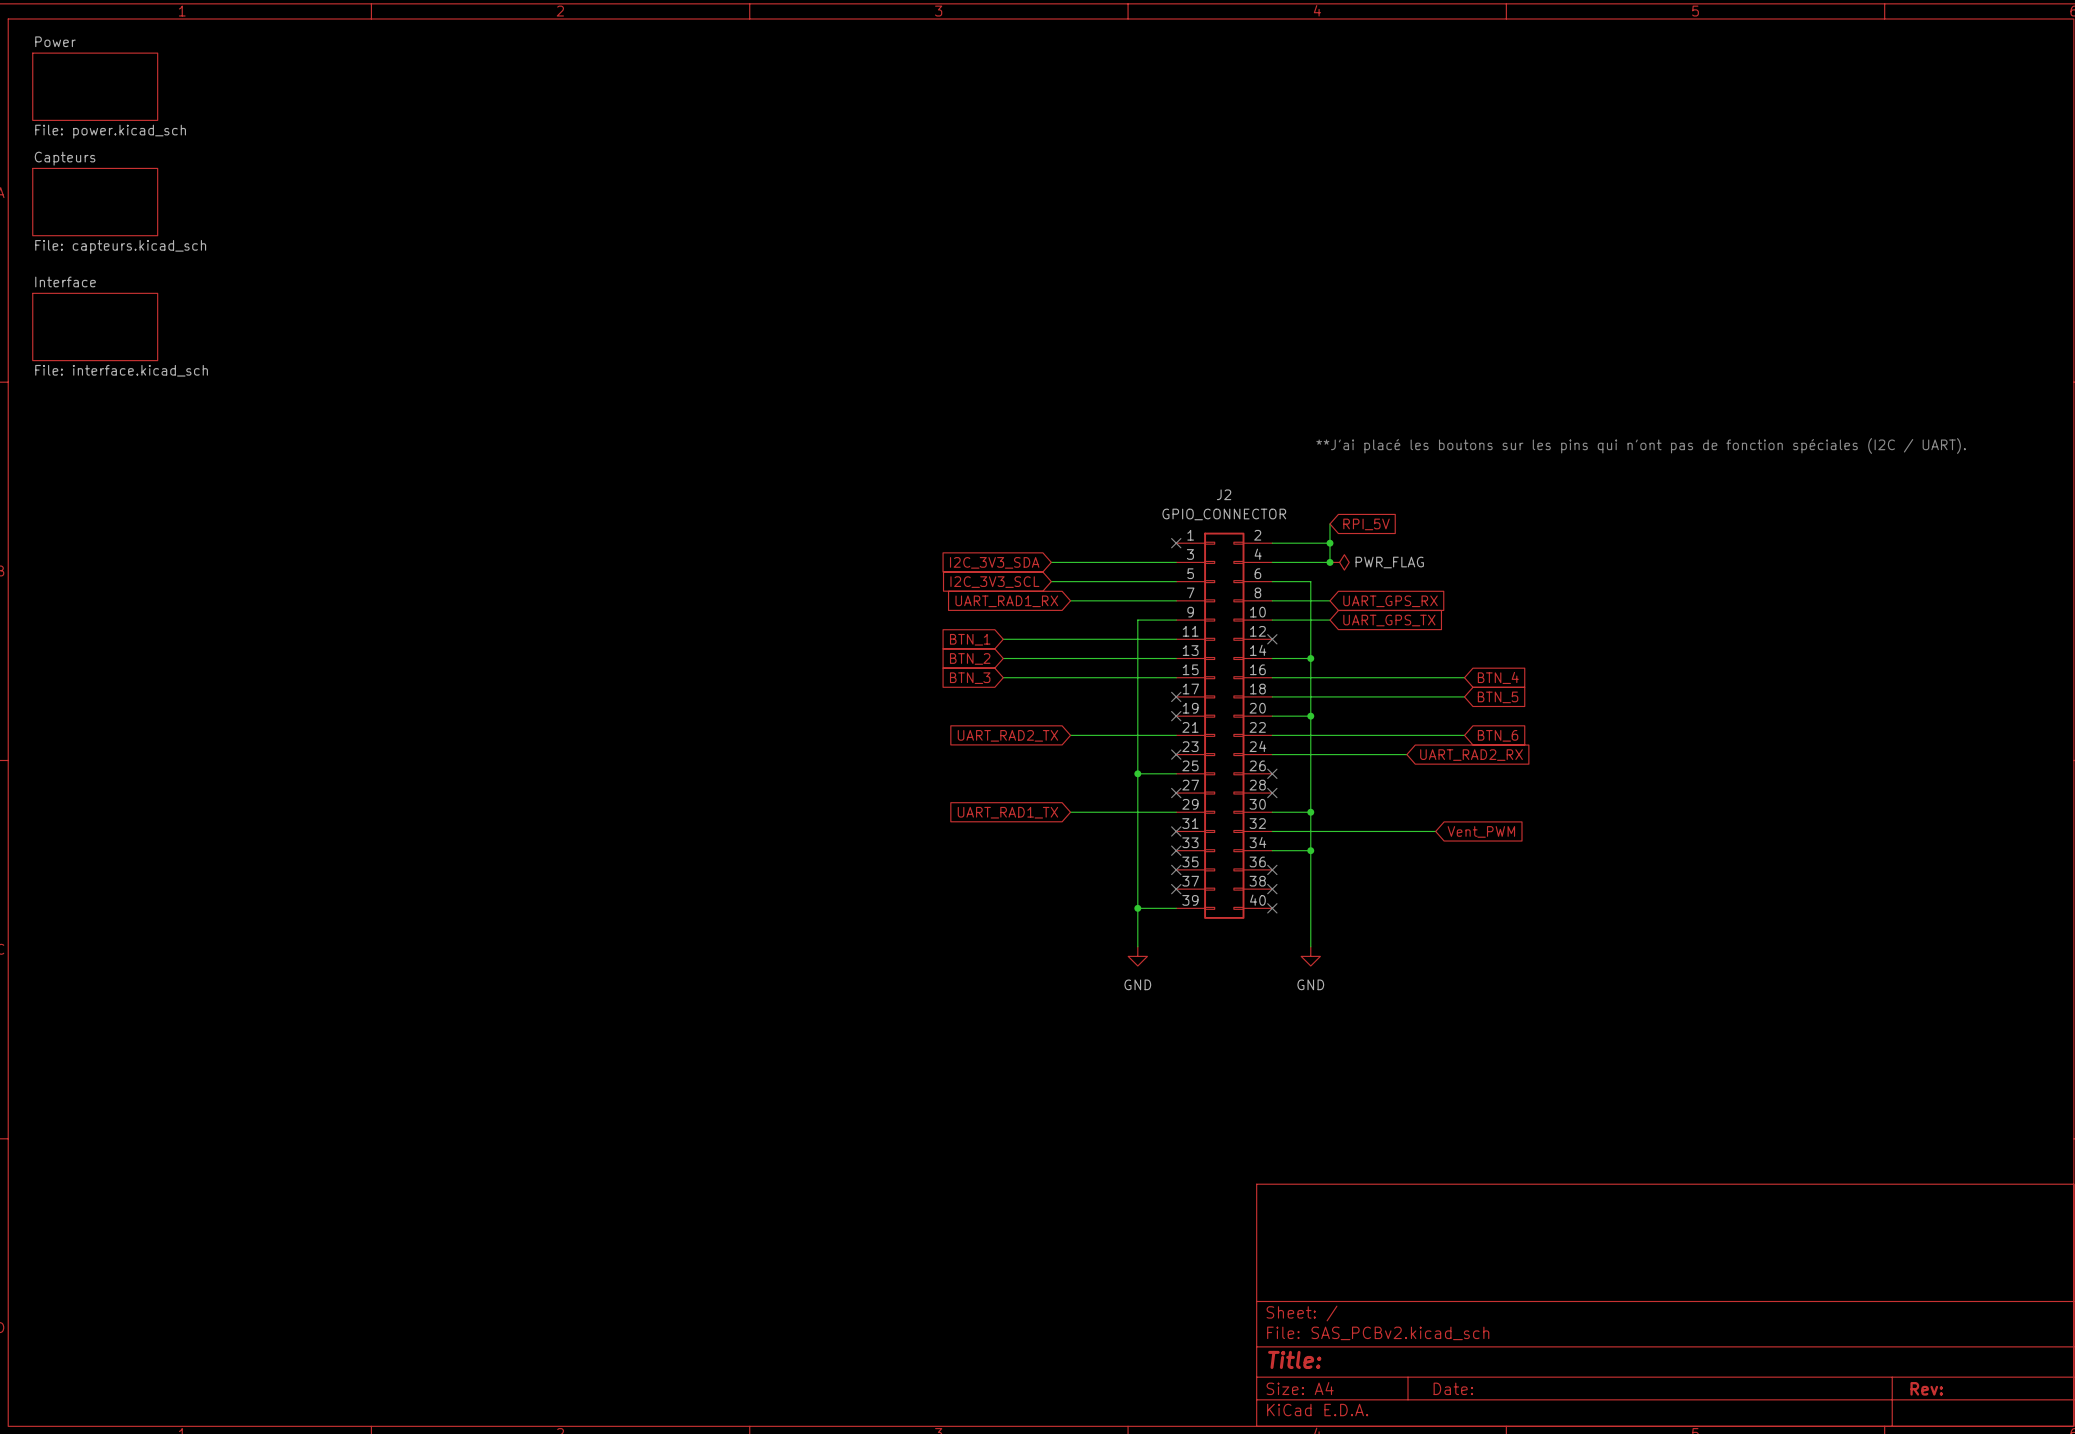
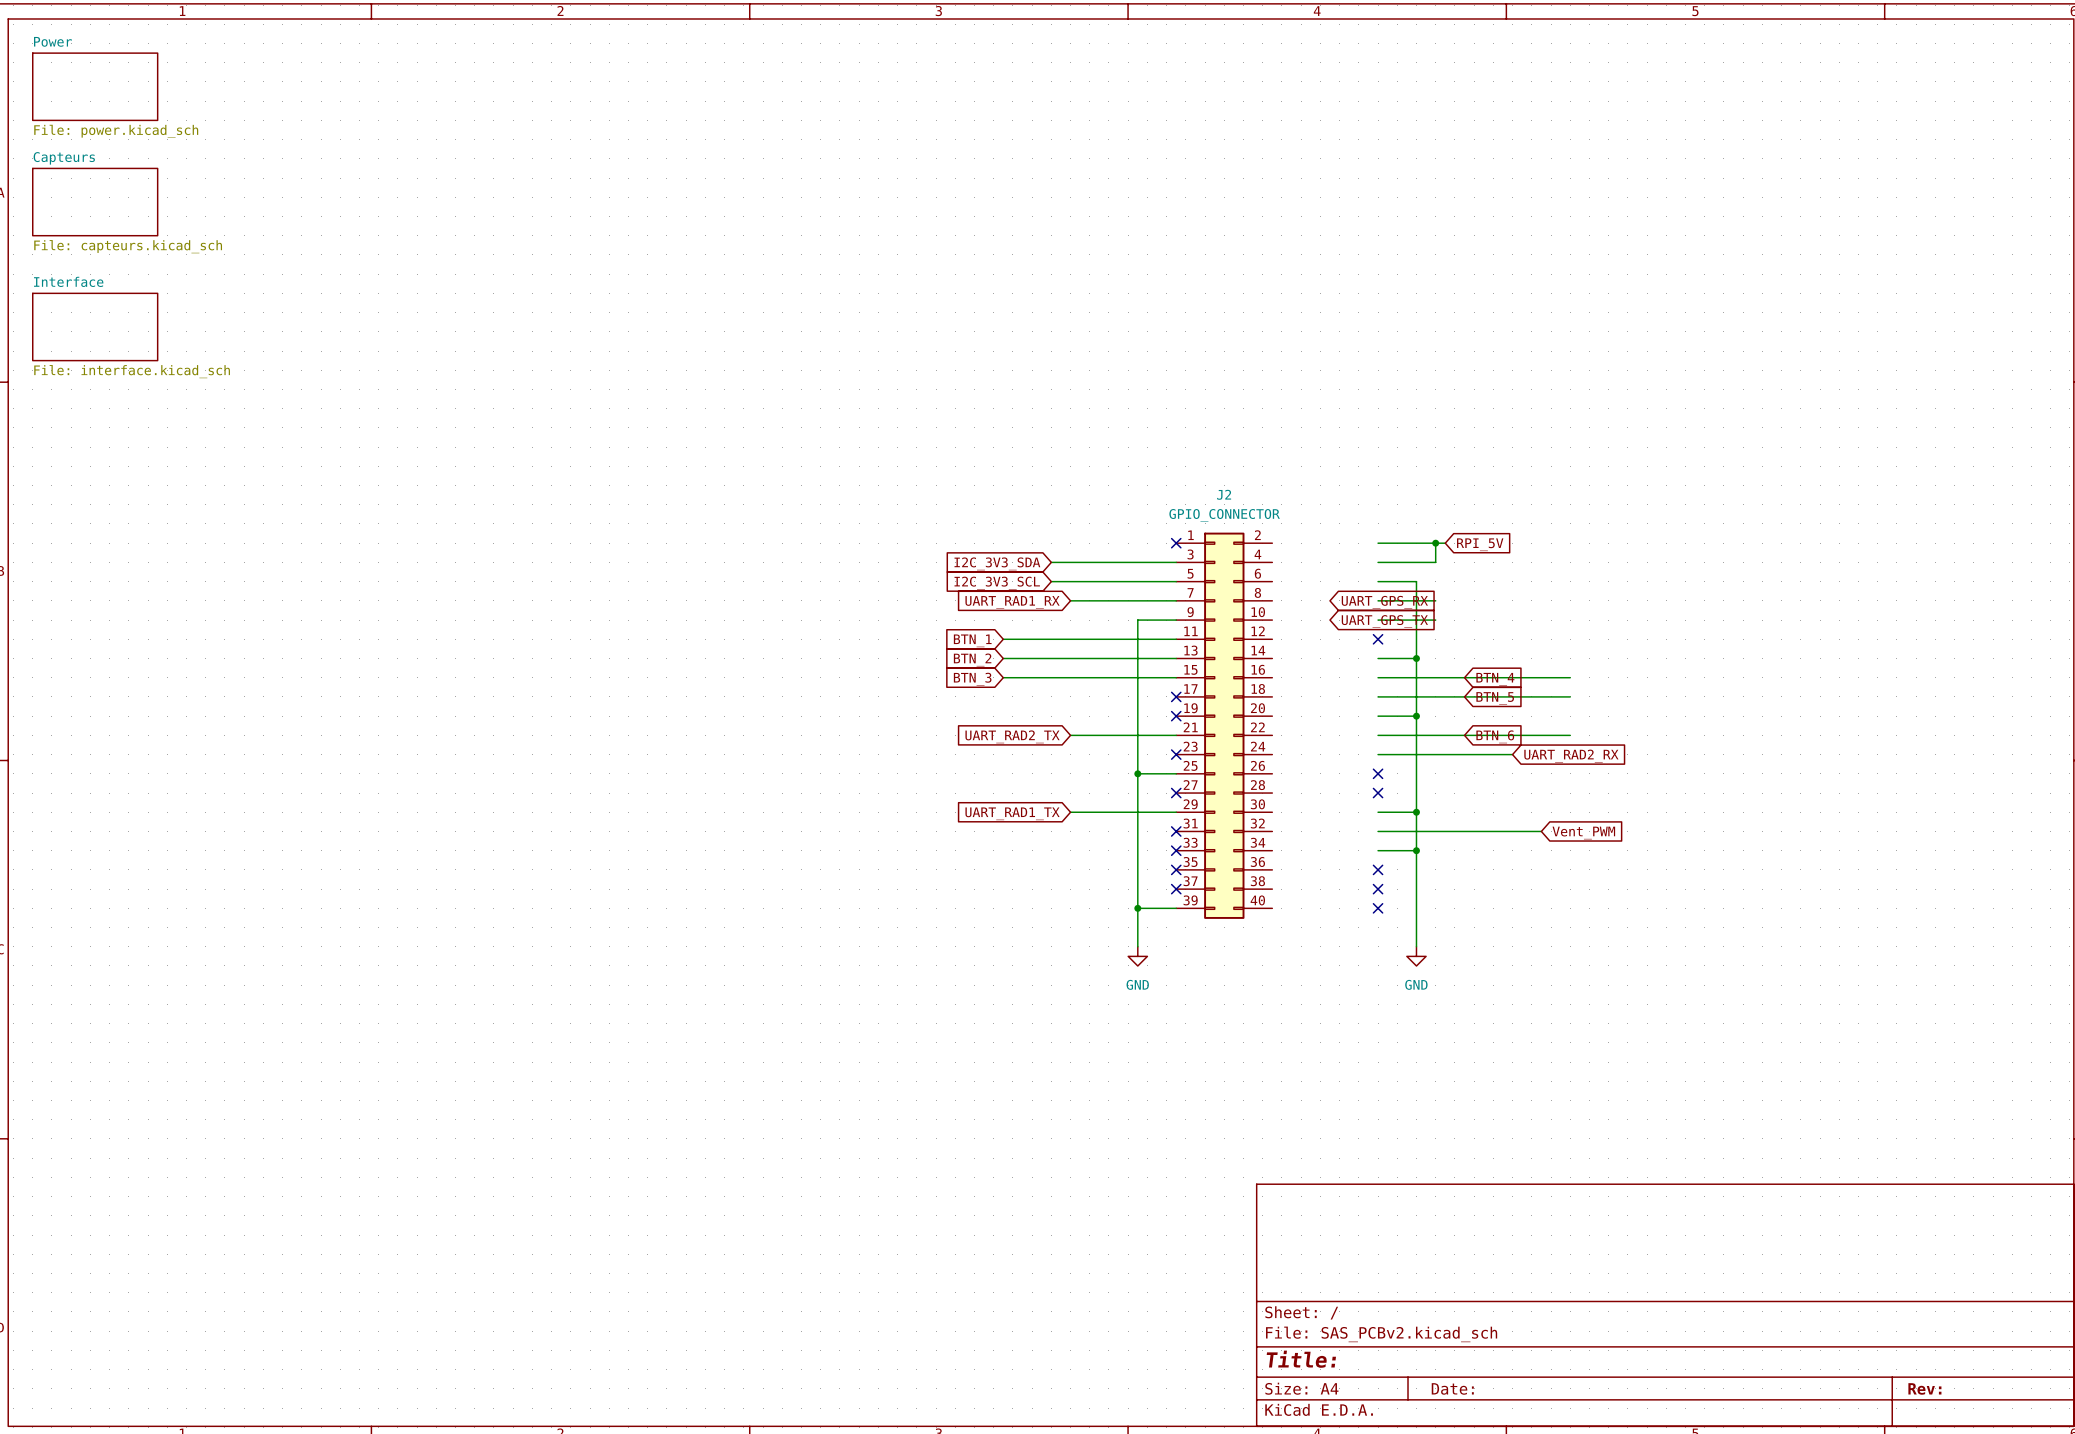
text: **J'ai placé les boutons sur les pins qui n'ont pas de fonction spéciales (I2C / UART). (1641, 445) -> none
wire: (1329, 523) (1329, 562) (1272, 562) -> none
global label position: RPI_5V (1366, 524) -> RPI_5V (1480, 544)
wire: (1272, 543) (1329, 543) -> none
junction: (1329, 543) -> none
wire: none -> (1378, 543) (1445, 543)
wire: none -> (1435, 543) (1435, 562) (1378, 562)
junction: none -> (1435, 543)
junction: (1329, 562) -> none
power symbol: PWR_FLAG (1339, 562) -> none
wire: (1272, 581) (1310, 581) (1310, 946) -> (1378, 581) (1416, 581) (1416, 946)
wire: (1272, 600) (1329, 600) -> (1378, 600) (1435, 600)
wire: (1272, 620) (1329, 620) -> (1378, 620) (1435, 620)
no-connect mark: (1272, 639) -> none
no-connect mark: none -> (1378, 639)
wire: (1272, 658) (1310, 658) -> (1378, 658) (1416, 658)
junction: (1310, 658) -> none
junction: none -> (1416, 658)
wire: (1272, 677) (1378, 677) -> none
wire: none -> (1464, 677) (1570, 677)
wire: (1272, 696) (1378, 696) -> none
wire: none -> (1464, 696) (1570, 696)
wire: (1272, 716) (1310, 716) -> (1378, 716) (1416, 716)
junction: (1310, 716) -> none
junction: none -> (1416, 716)
wire: (1272, 735) (1378, 735) -> none
wire: none -> (1464, 735) (1570, 735)
wire: (1272, 754) (1378, 754) -> (1406, 754) (1512, 754)
global label position: UART_RAD2_RX (1471, 755) -> UART_RAD2_RX (1571, 756)
no-connect mark: (1272, 773) -> none
no-connect mark: none -> (1378, 773)
no-connect mark: (1272, 793) -> none
no-connect mark: none -> (1378, 793)
wire: (1272, 812) (1310, 812) -> (1378, 812) (1416, 812)
junction: (1310, 812) -> none
junction: none -> (1416, 812)
wire: (1272, 831) (1378, 831) -> (1435, 831) (1541, 831)
global label position: Vent_PWM (1481, 831) -> Vent_PWM (1583, 833)
wire: (1272, 850) (1310, 850) -> (1378, 850) (1416, 850)
junction: (1310, 850) -> none
junction: none -> (1416, 850)
no-connect mark: (1272, 869) -> none
no-connect mark: none -> (1378, 869)
no-connect mark: (1272, 889) -> none
no-connect mark: none -> (1378, 889)
no-connect mark: (1272, 908) -> none
no-connect mark: none -> (1378, 908)
power symbol position: GND (1310, 956) -> GND (1416, 956)

